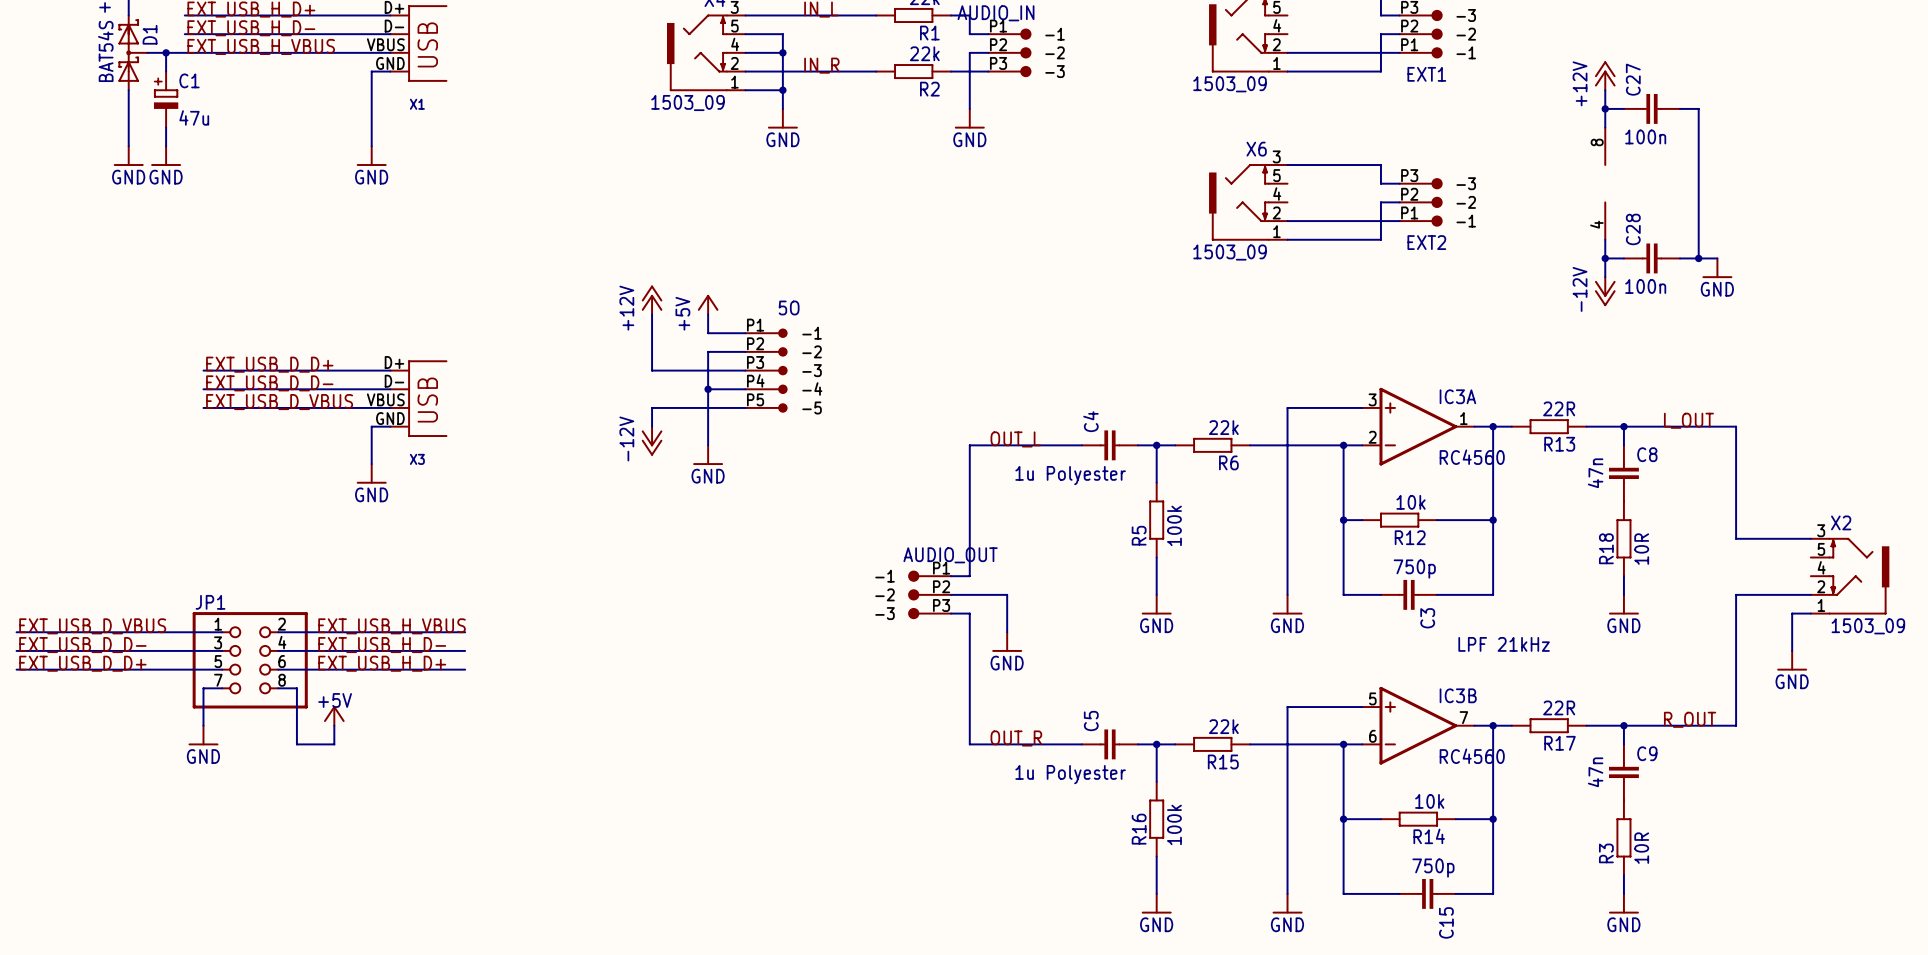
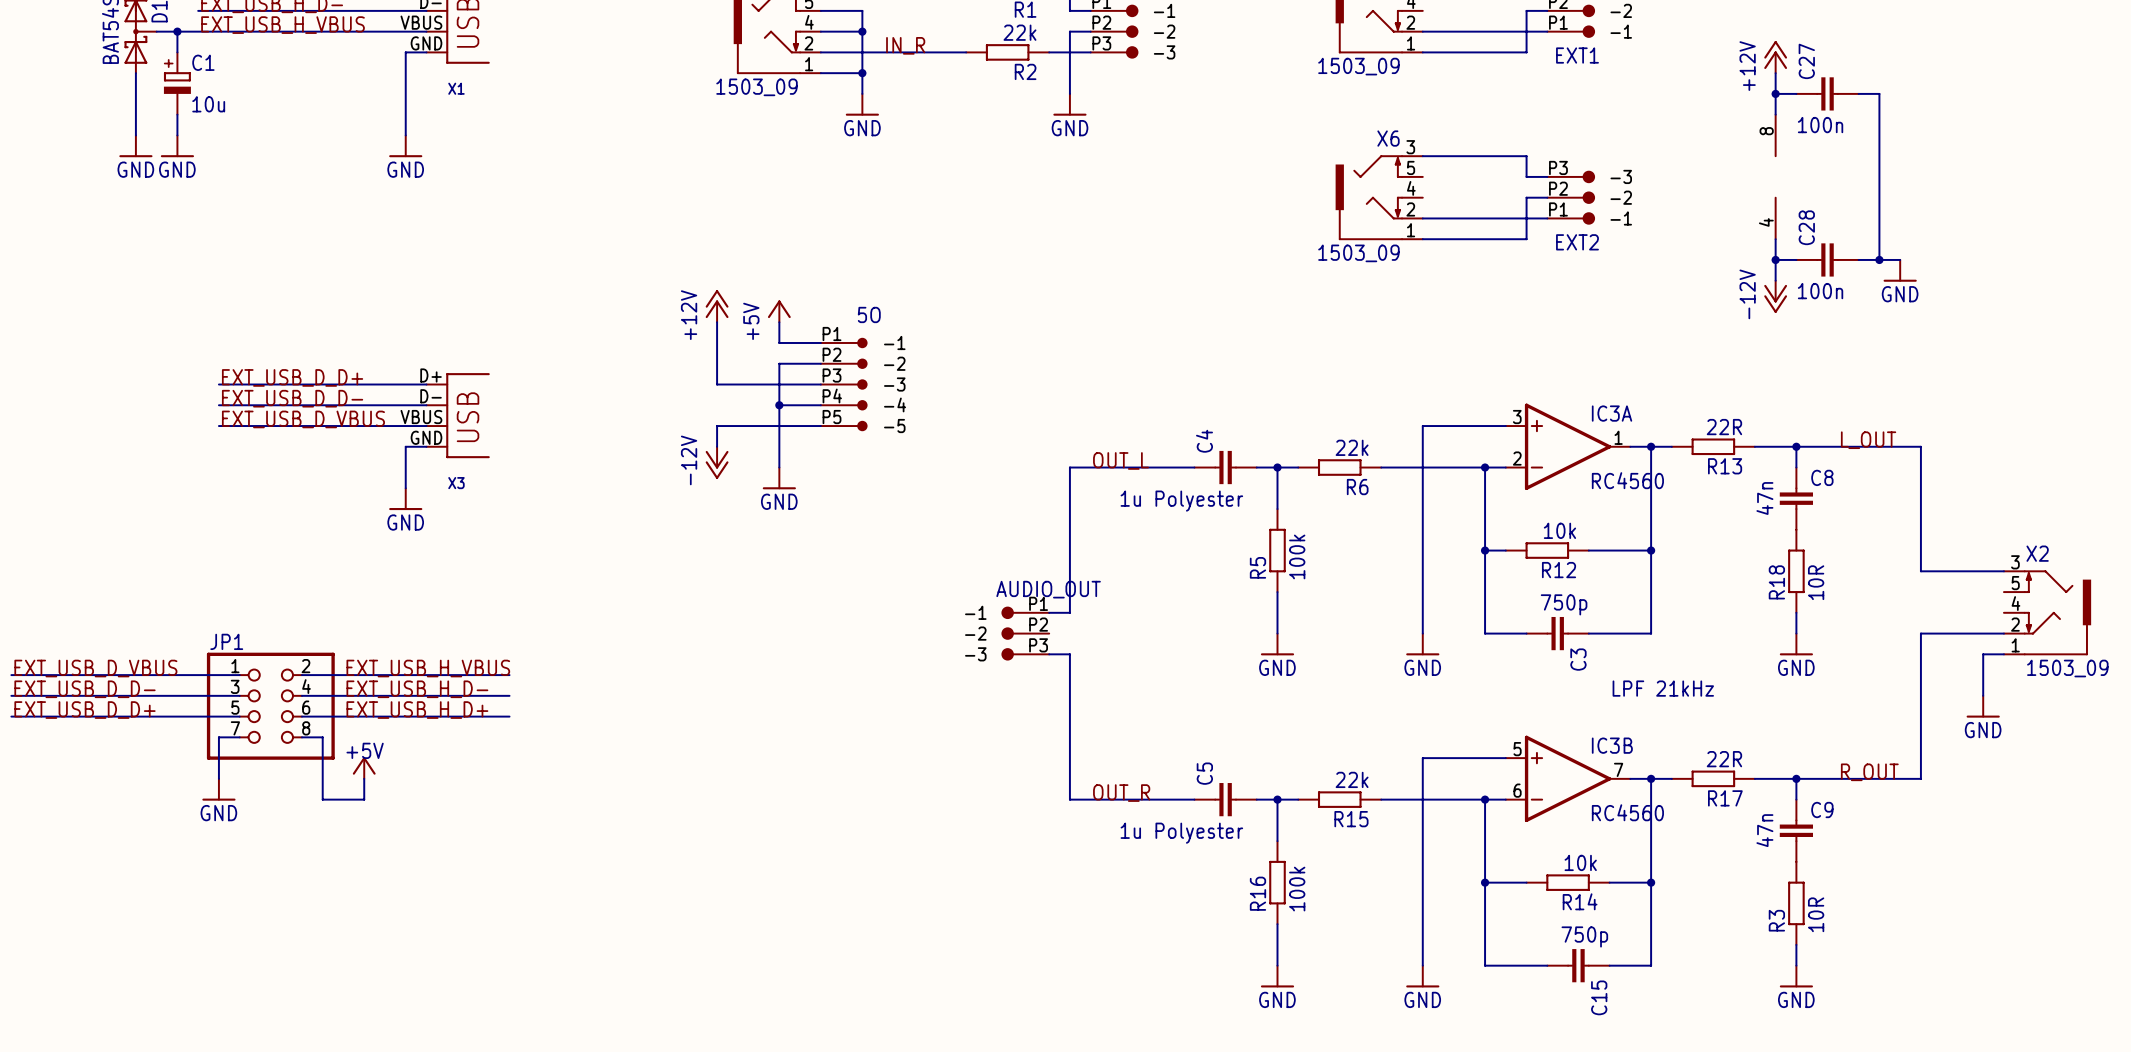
C1 value: 47u (194, 117) -> 10u (208, 104)
wire: (951, 594) (1007, 594) (1007, 632) -> none
power symbol: GND (1007, 642) -> none

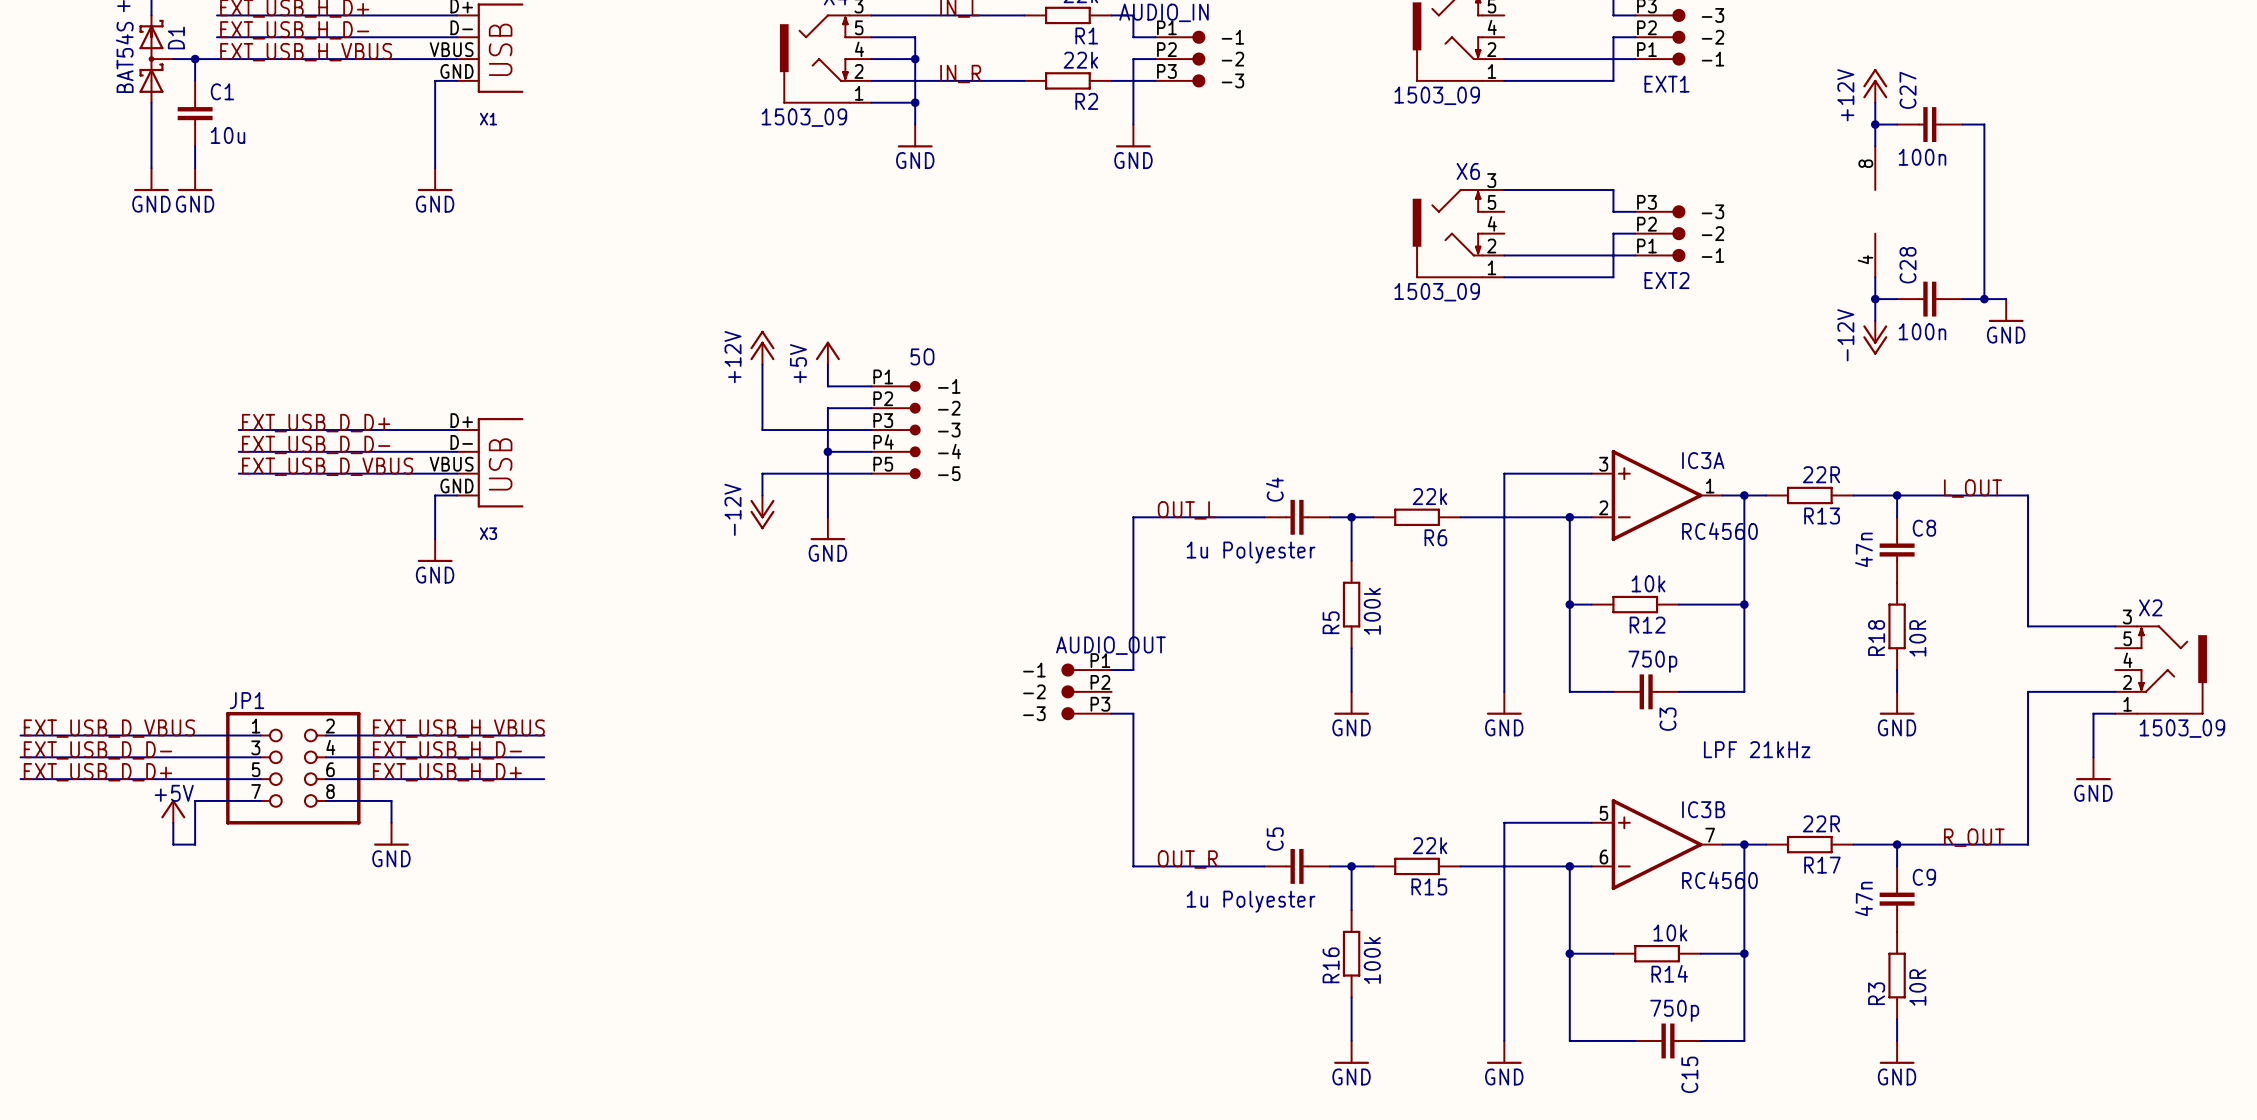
C1 symbol: [163, 52, 191, 115] -> [177, 80, 213, 147]
wire: (218, 737) (218, 778) -> (238, 800) (195, 800) (195, 844) (173, 844) (173, 822)
wire: (322, 737) (322, 799) (364, 799) (364, 778) -> (347, 800) (391, 800) (391, 822)
power symbol: none -> +5V (173, 811)
power symbol: +5V (364, 767) -> GND (391, 834)
power symbol: GND (218, 789) -> none

